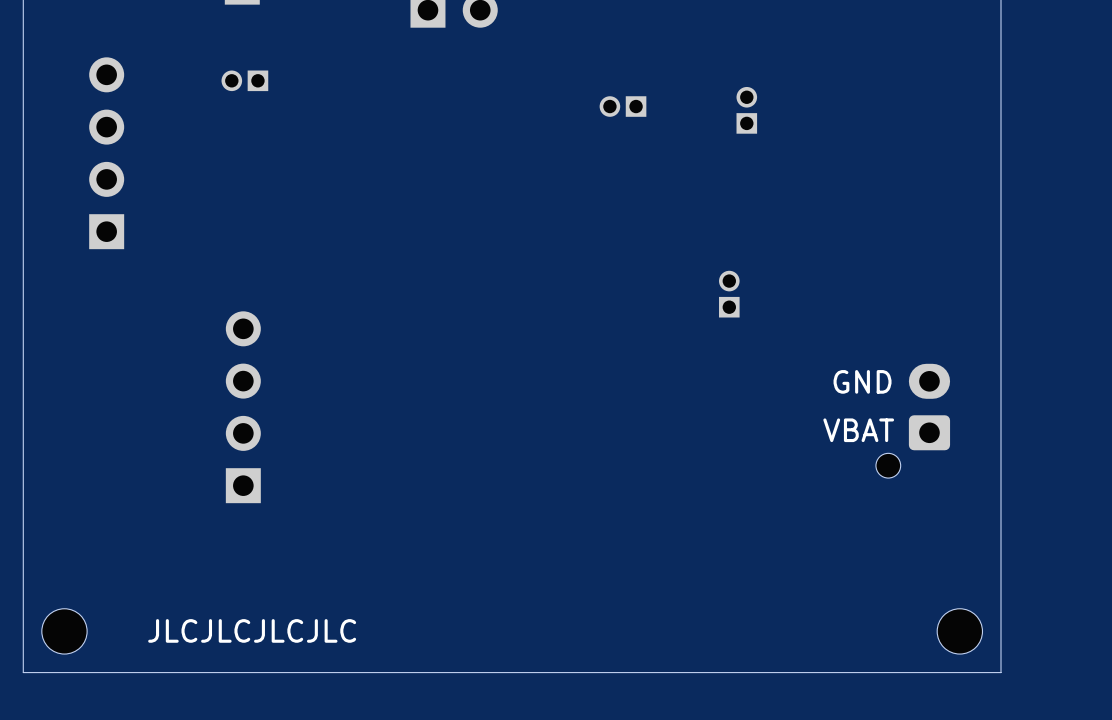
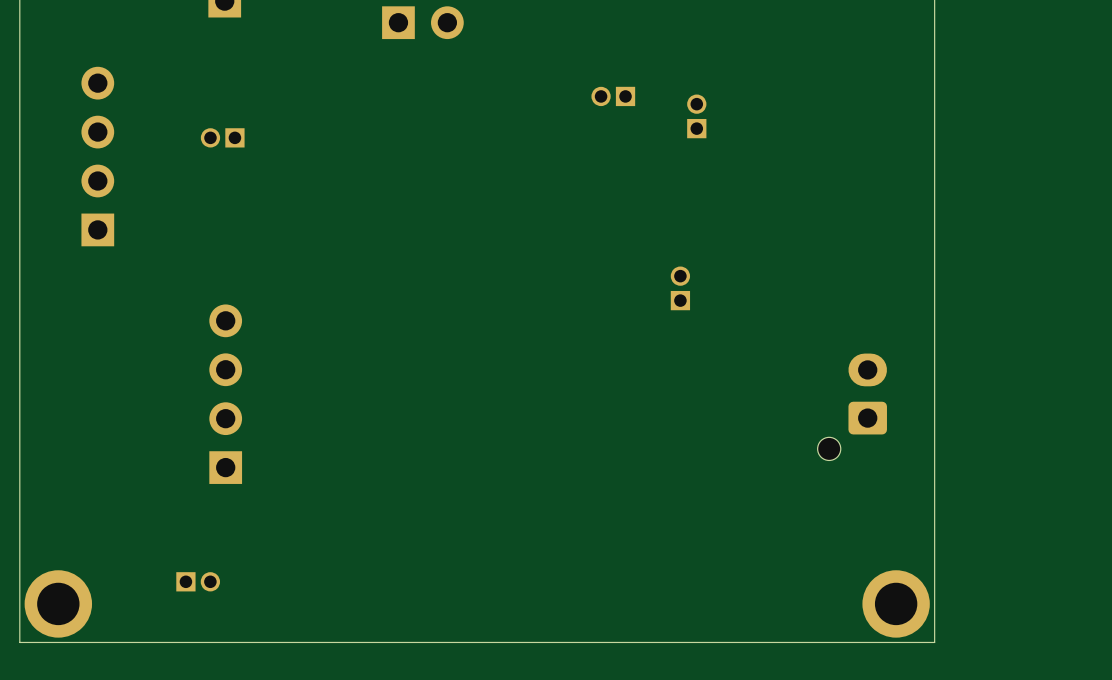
part position: (244, 80) -> (222, 137)
part position: (622, 106) -> (613, 96)
text: GND (862, 381) -> none
text: VBAT (858, 430) -> none
part: none -> (198, 581)
part footprint: [41, 608, 88, 655] -> [24, 570, 93, 638]
part footprint: [937, 608, 983, 655] -> [862, 570, 930, 638]
text: JLCJLCJLCJLC (252, 630) -> none

